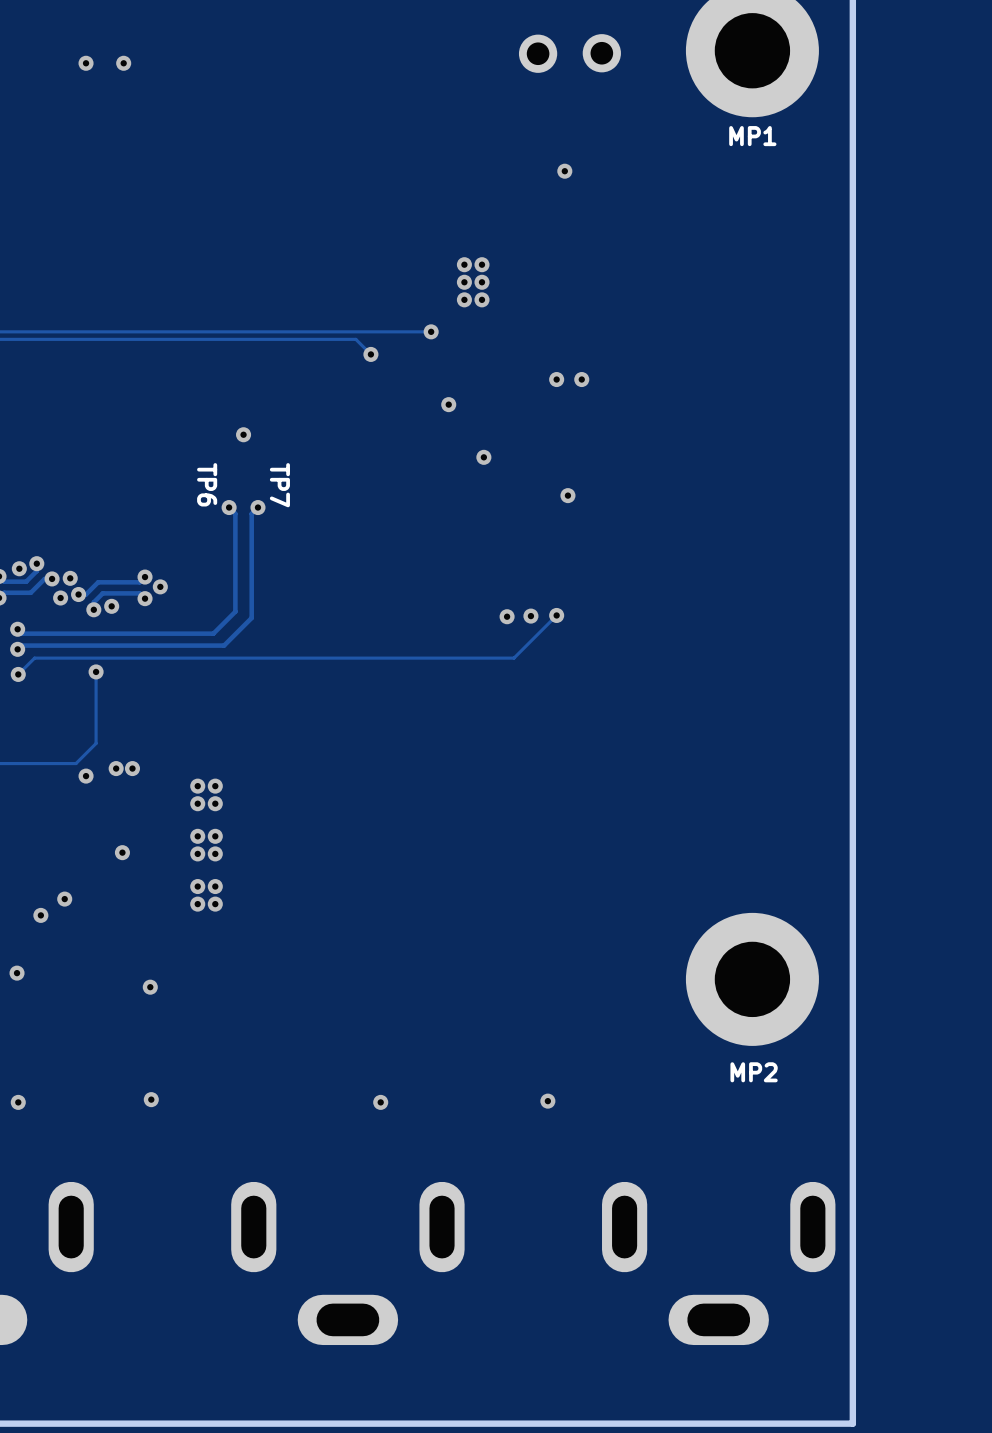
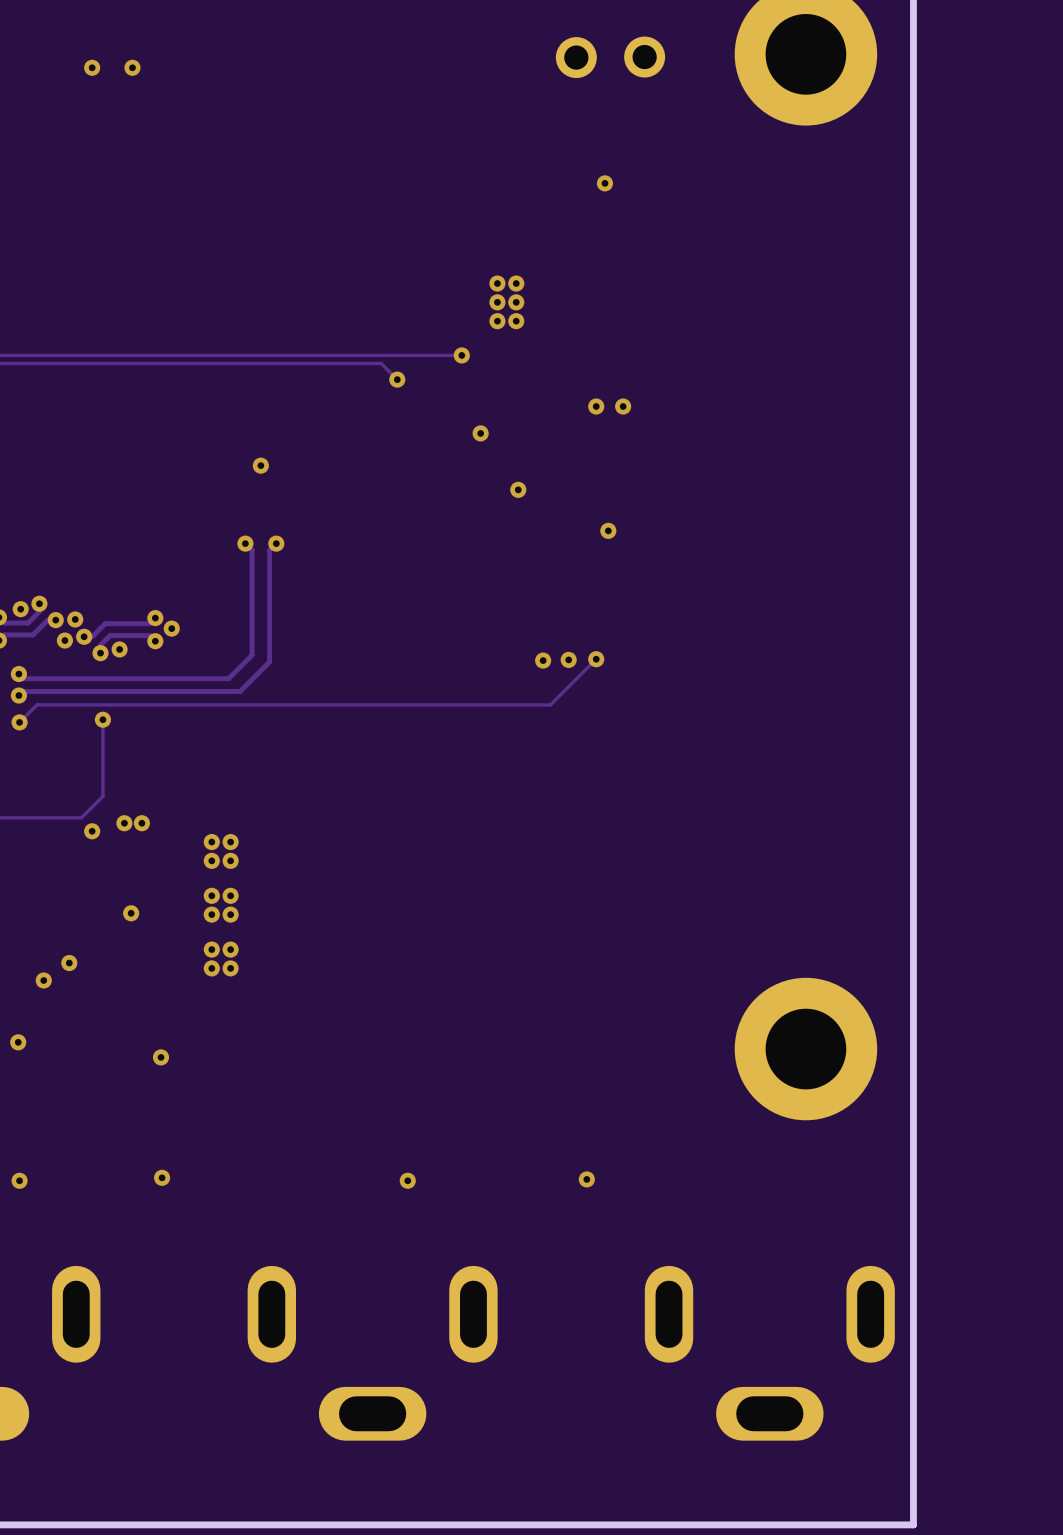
MP1 name: MP1 (752, 136) -> none
TP6: (207, 484) -> none
TP7: (279, 485) -> none
MP2 name: MP2 (754, 1072) -> none

